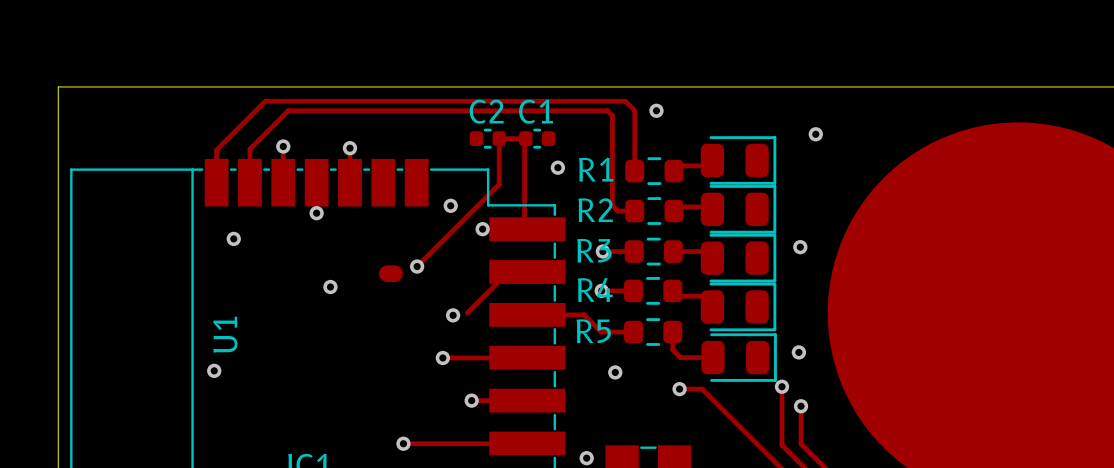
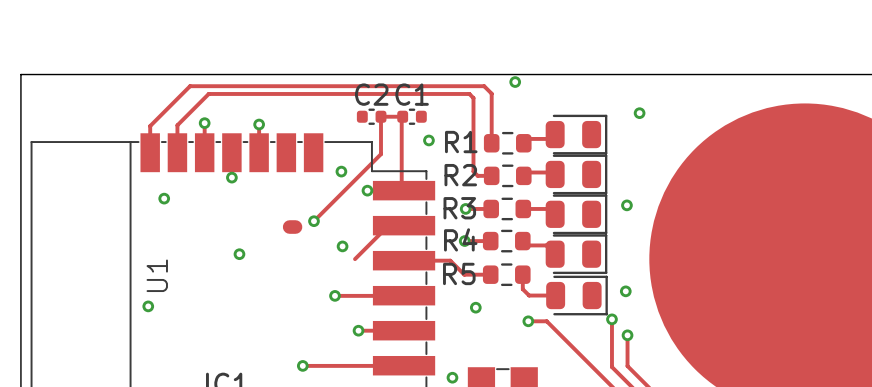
via position: (656, 110) -> (515, 82)
via position: (330, 287) -> (239, 254)
via position: (453, 315) -> (342, 246)

